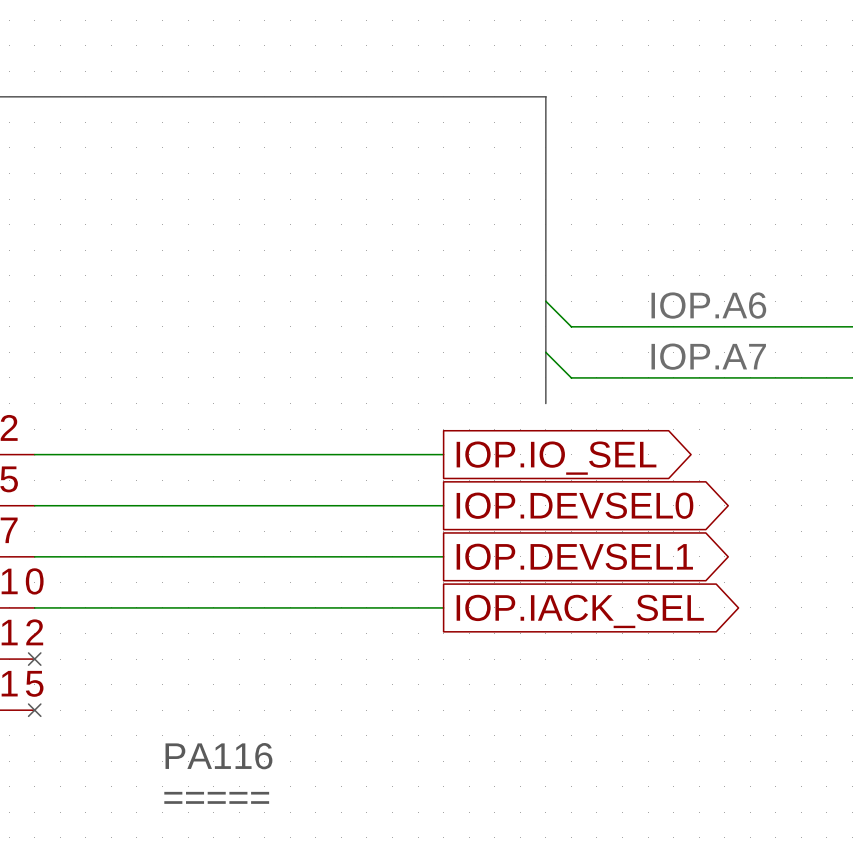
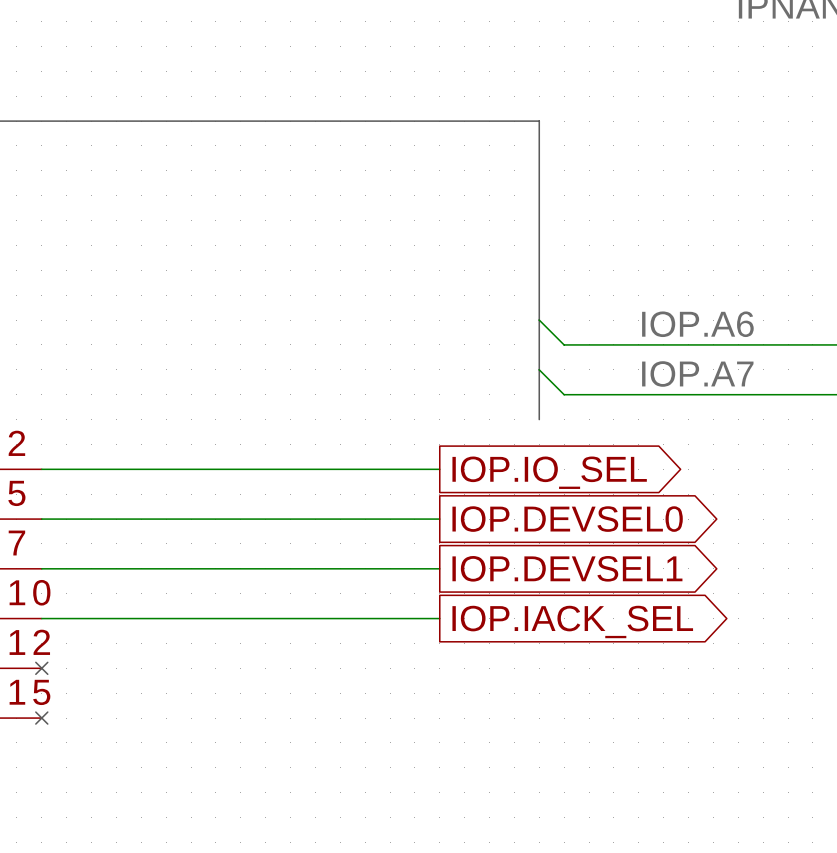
text: PA116 (218, 756) -> none
text: ===== (216, 797) -> none

